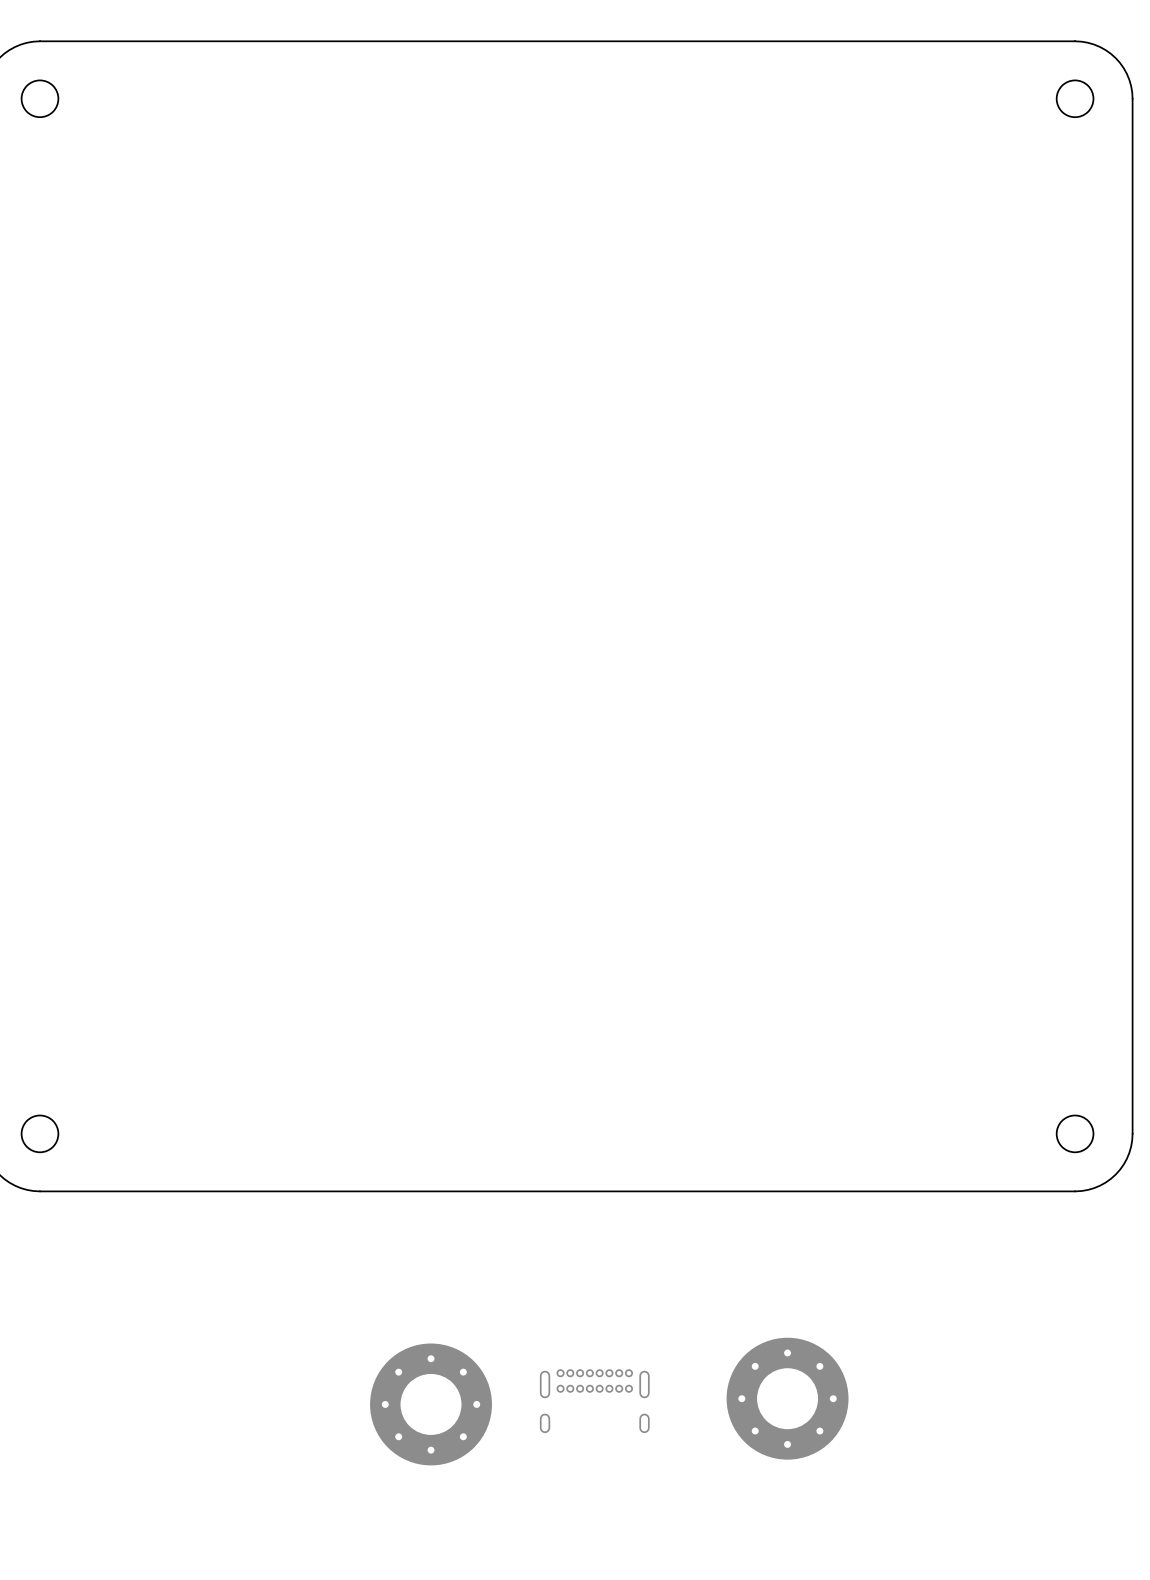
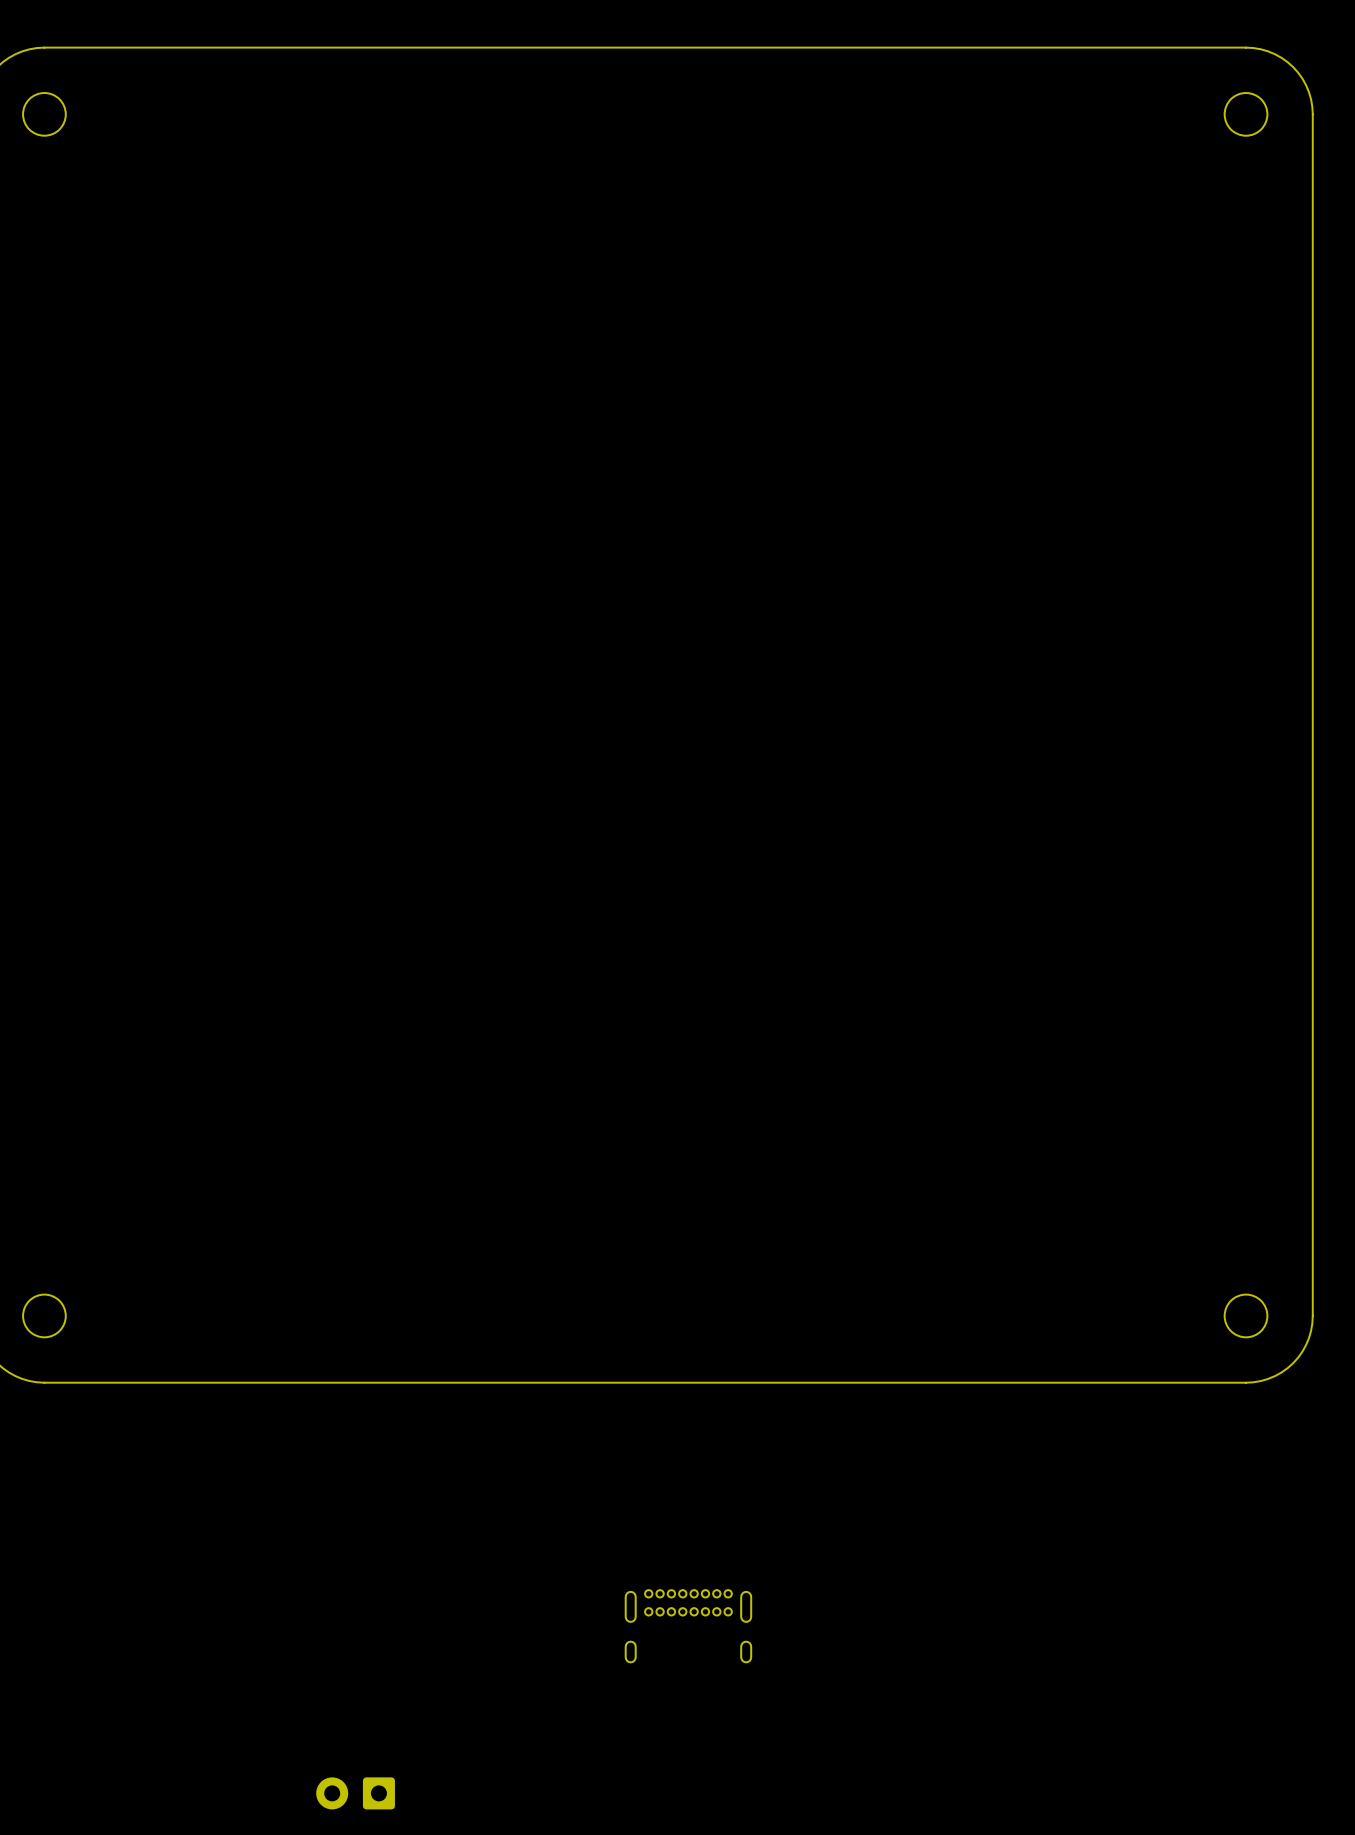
part: (787, 1398) -> none
part: (431, 1404) -> none
part: none -> (355, 1793)

